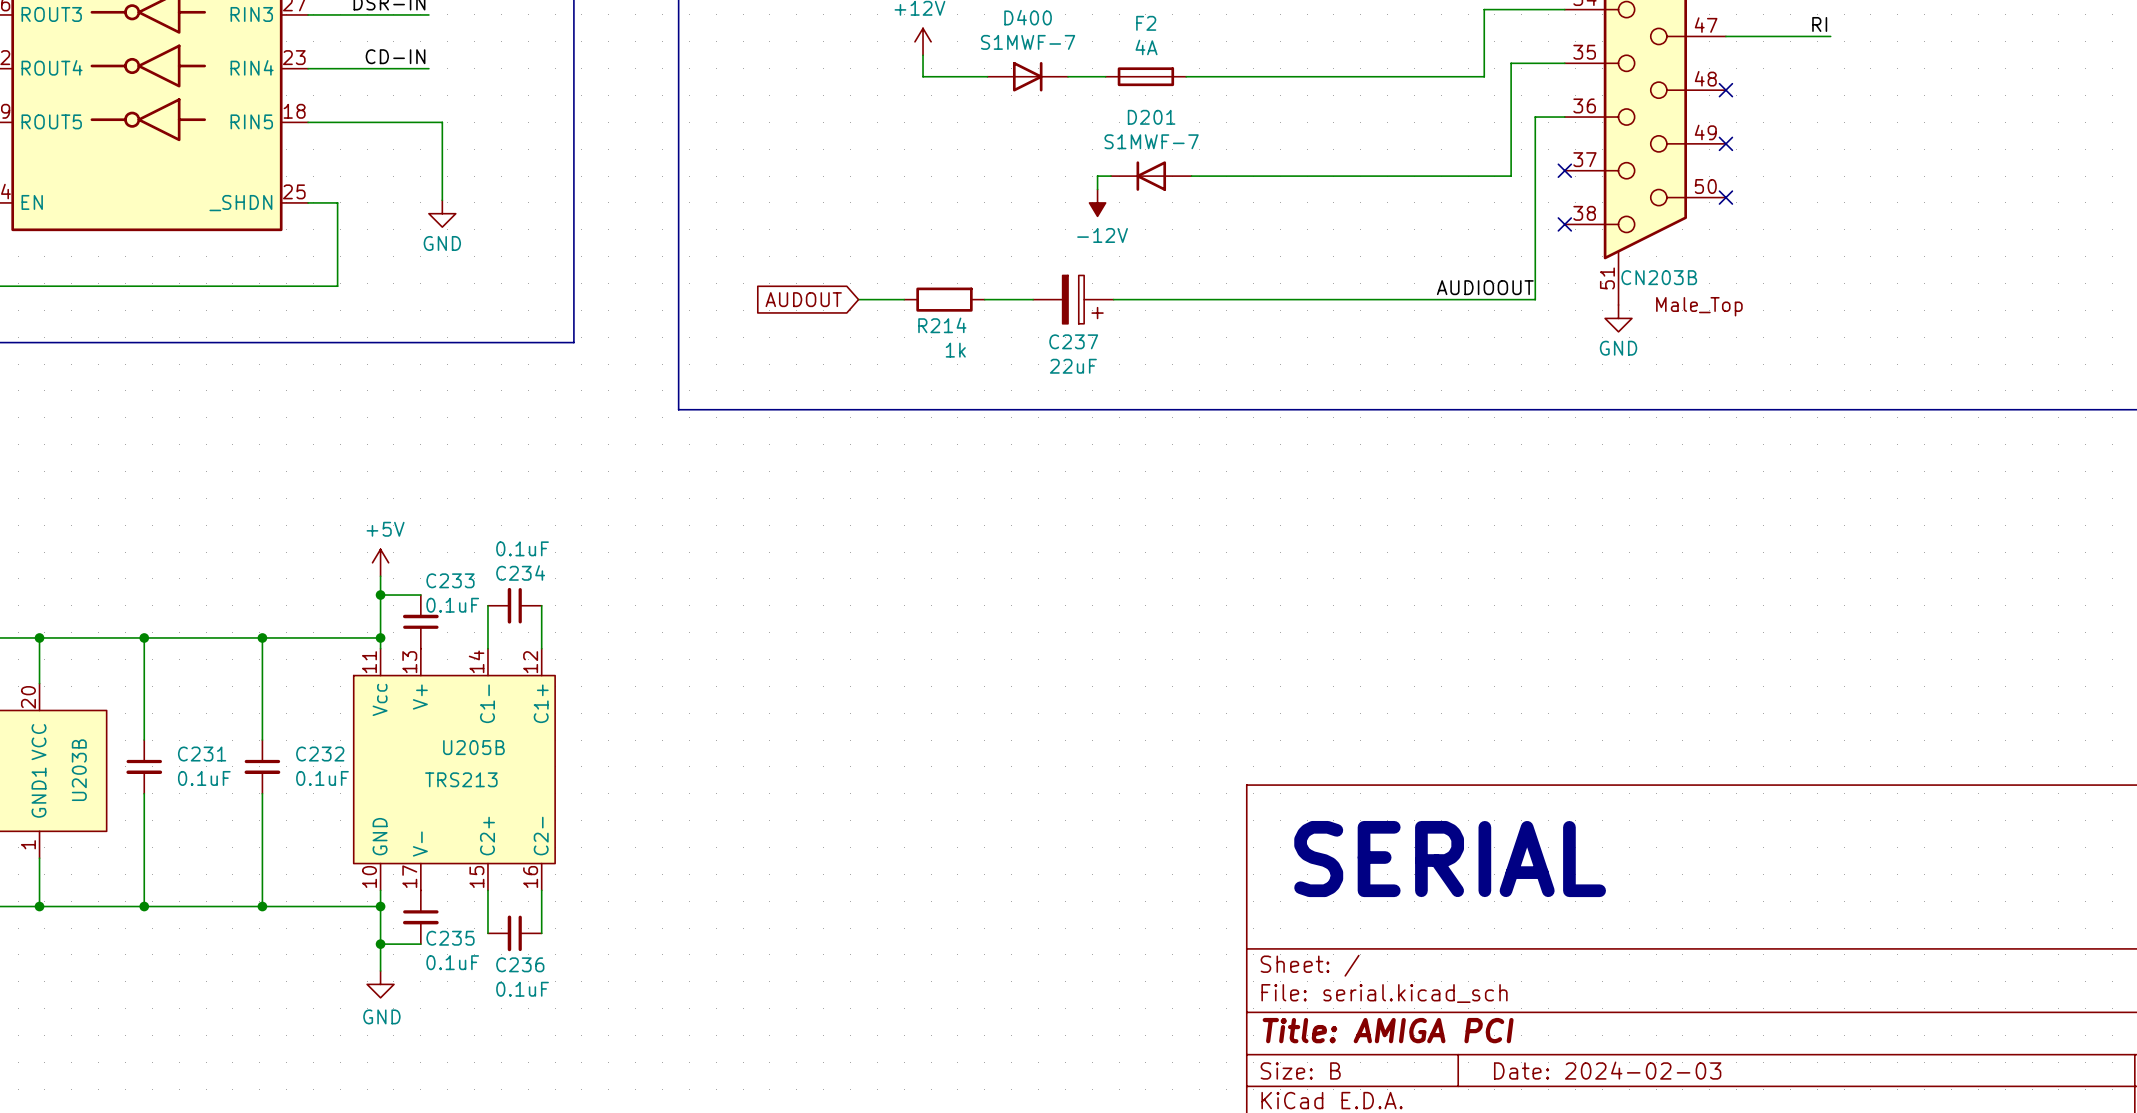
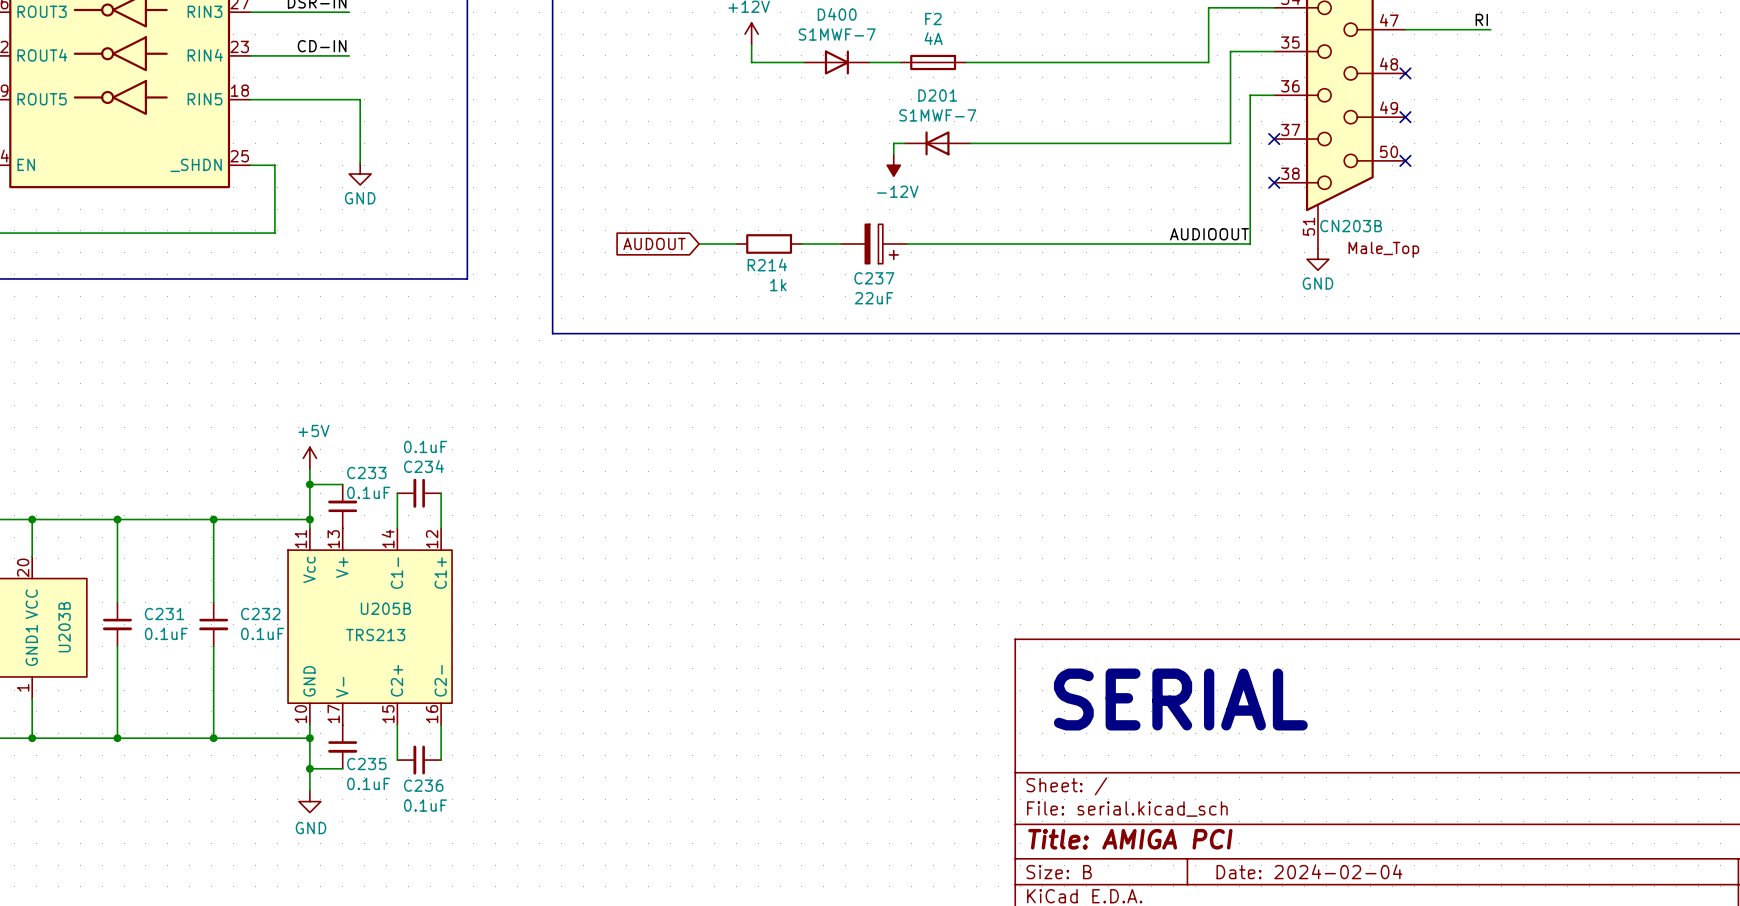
title block: Date: 2024-02-03 (1607, 1070) -> Date: 2024-02-04 (1309, 871)

